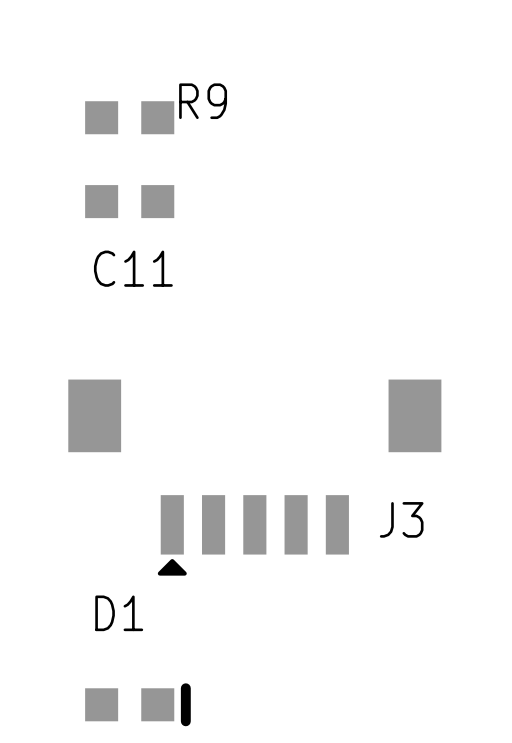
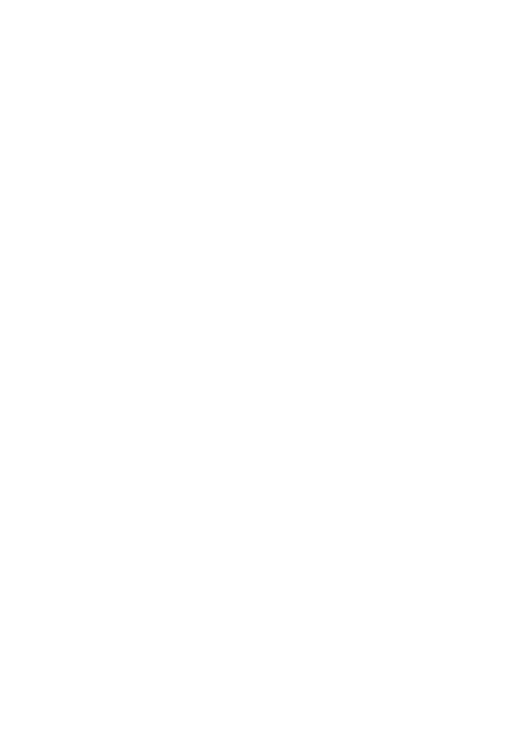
R9: (129, 117) -> none
C11: (129, 201) -> none
J3: (254, 477) -> none
D1: (137, 704) -> none

